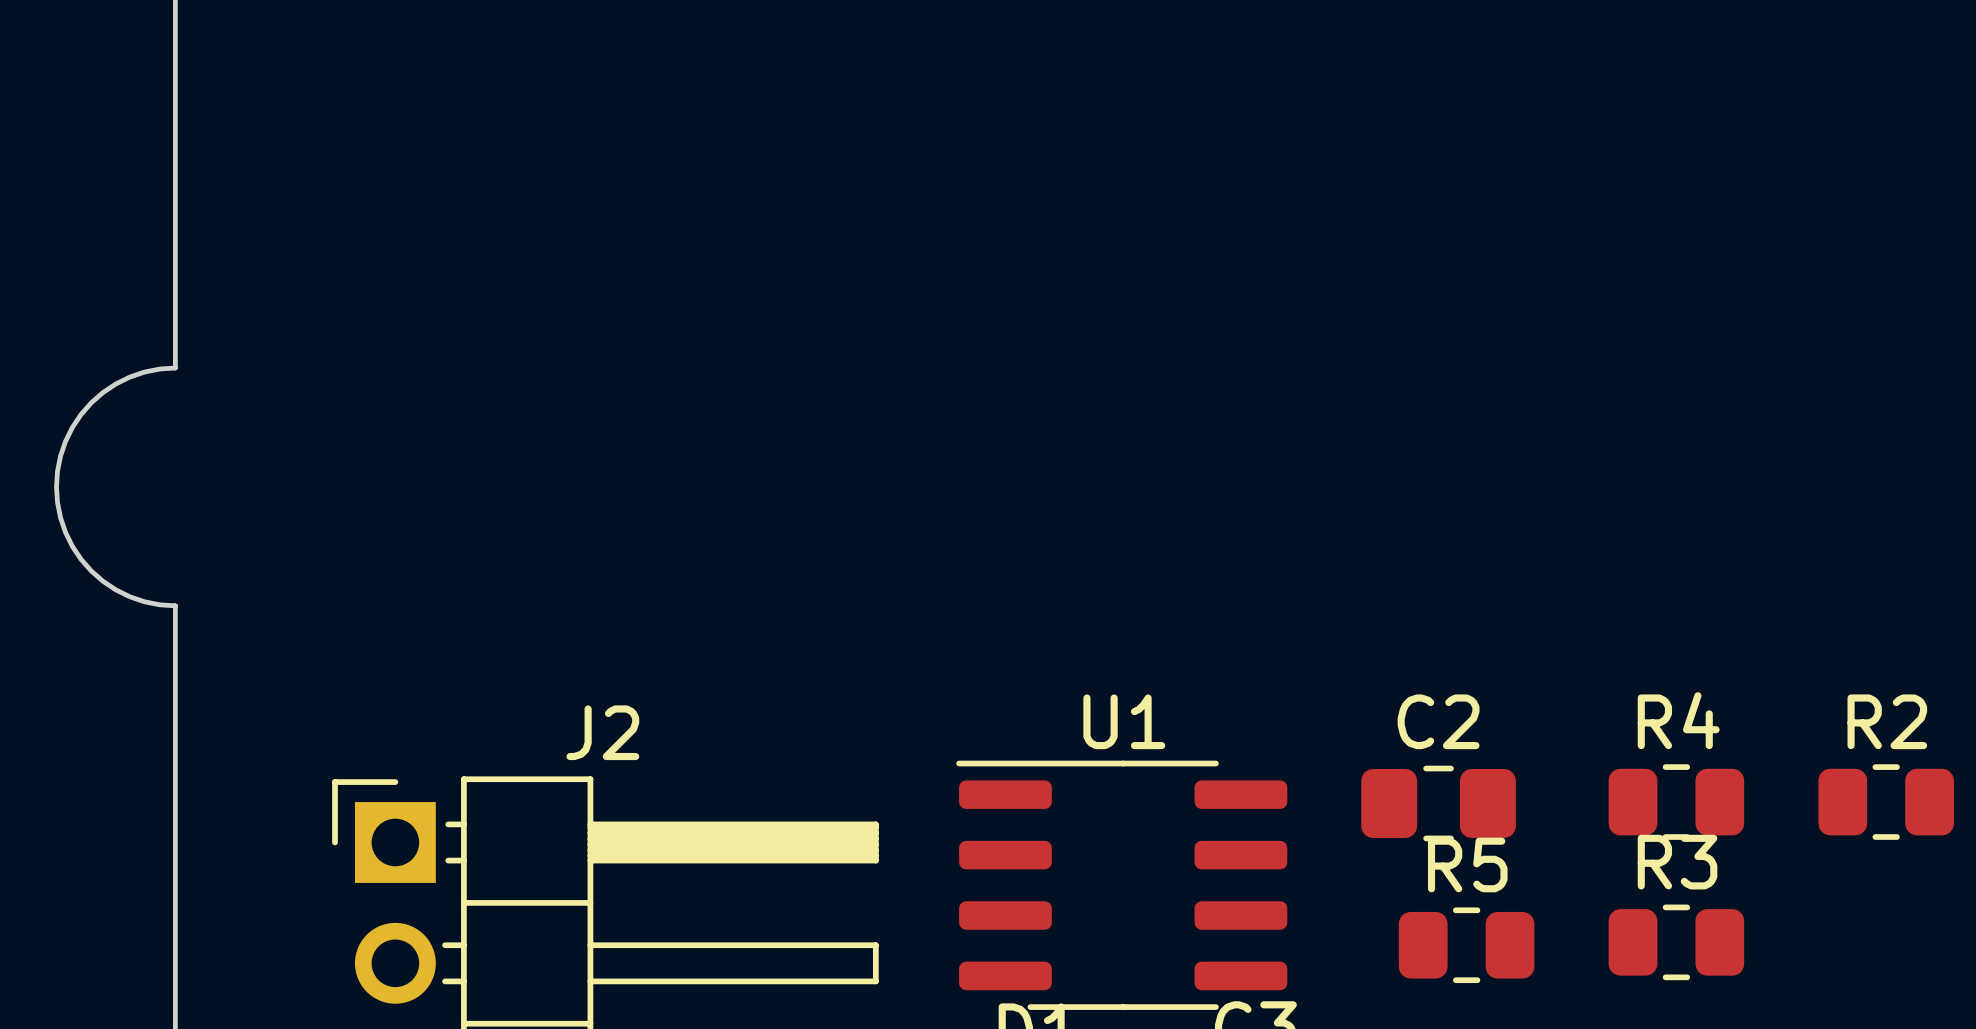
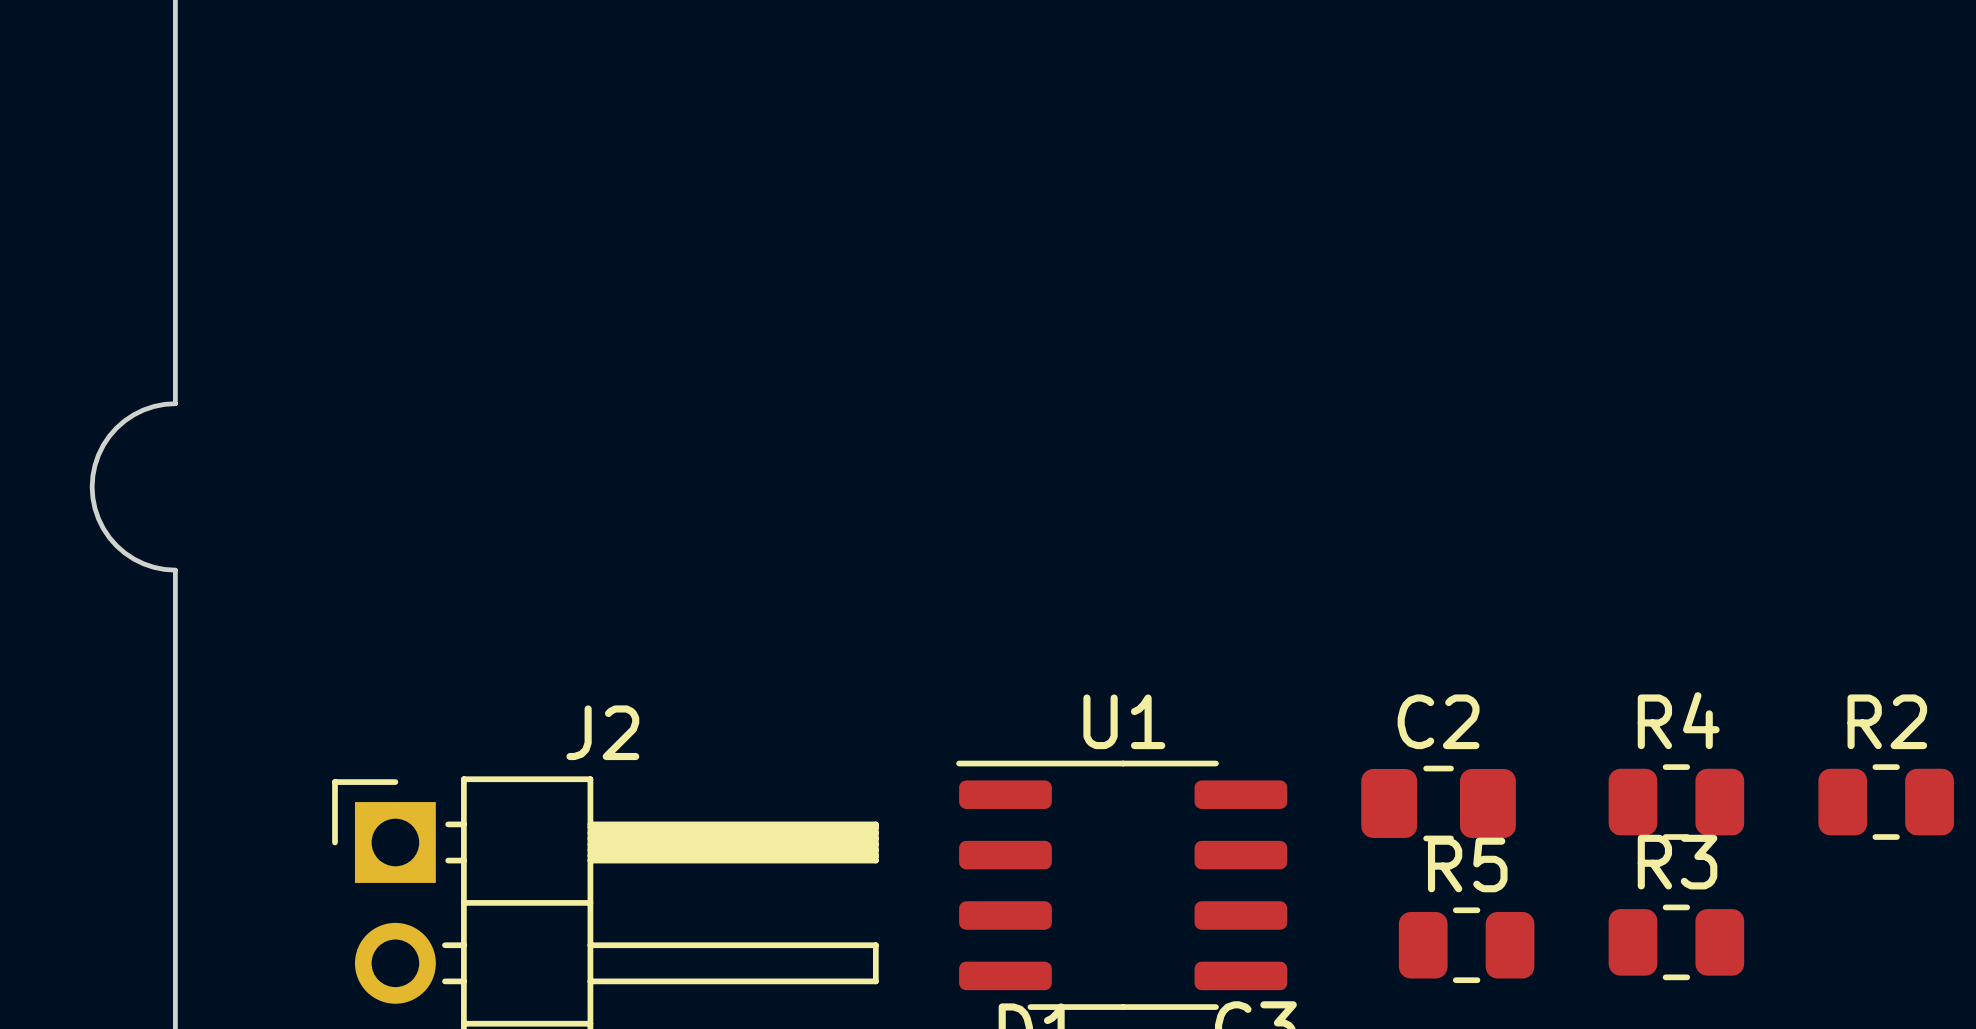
board edge: (175, 368) (159, 369) (129, 377) (103, 392) (91, 402) (72, 427) (65, 441) (57, 471) (56, 486) (57, 502) (65, 532) (72, 546) (91, 571) (103, 581) (129, 596) (159, 604) (175, 605) -> (175, 368) (175, 403) (143, 410) (116, 428) (98, 455) (92, 486) (98, 518) (116, 545) (143, 563) (175, 570) (175, 605)

